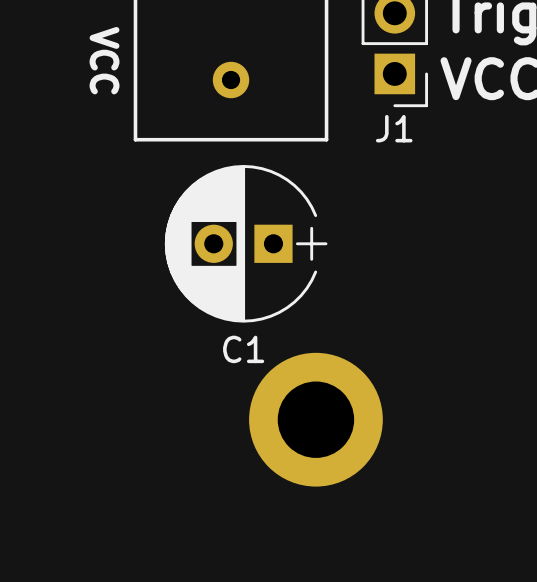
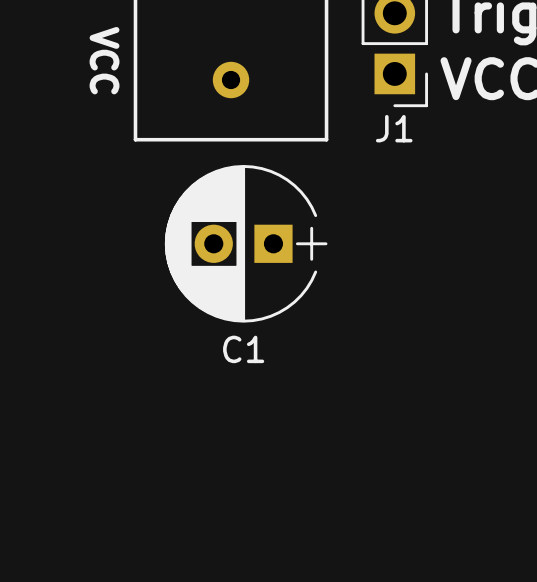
part: (315, 419) -> none

